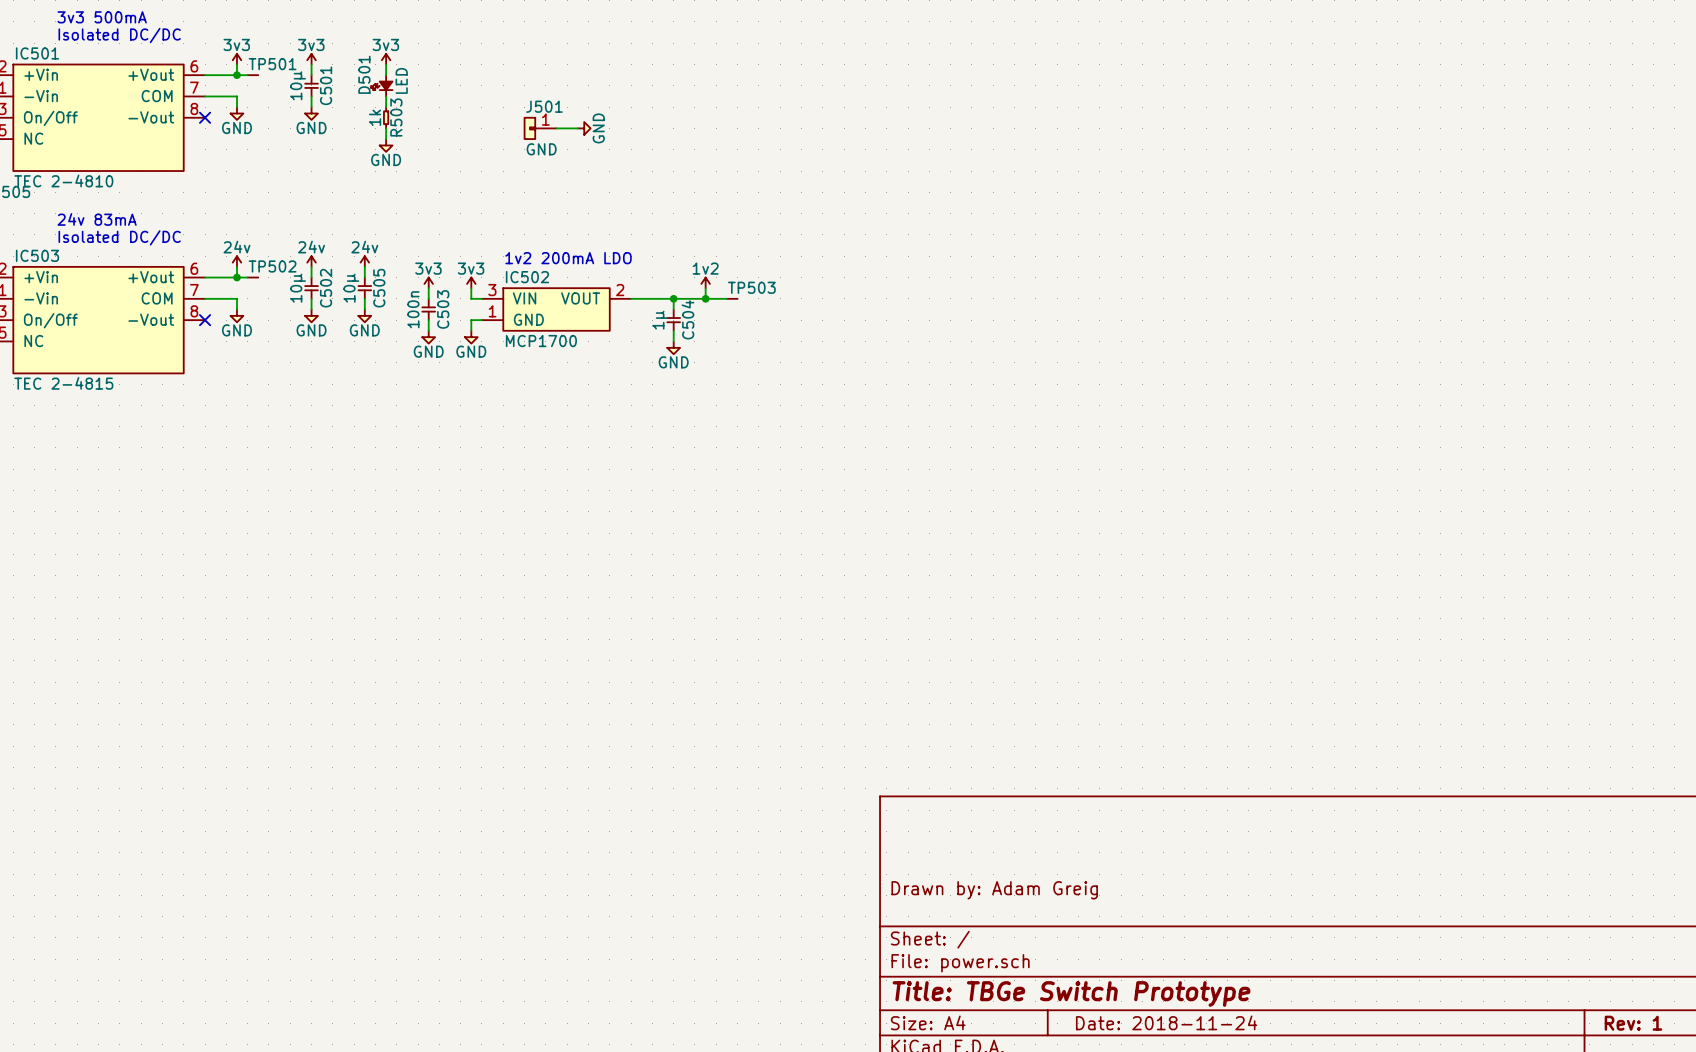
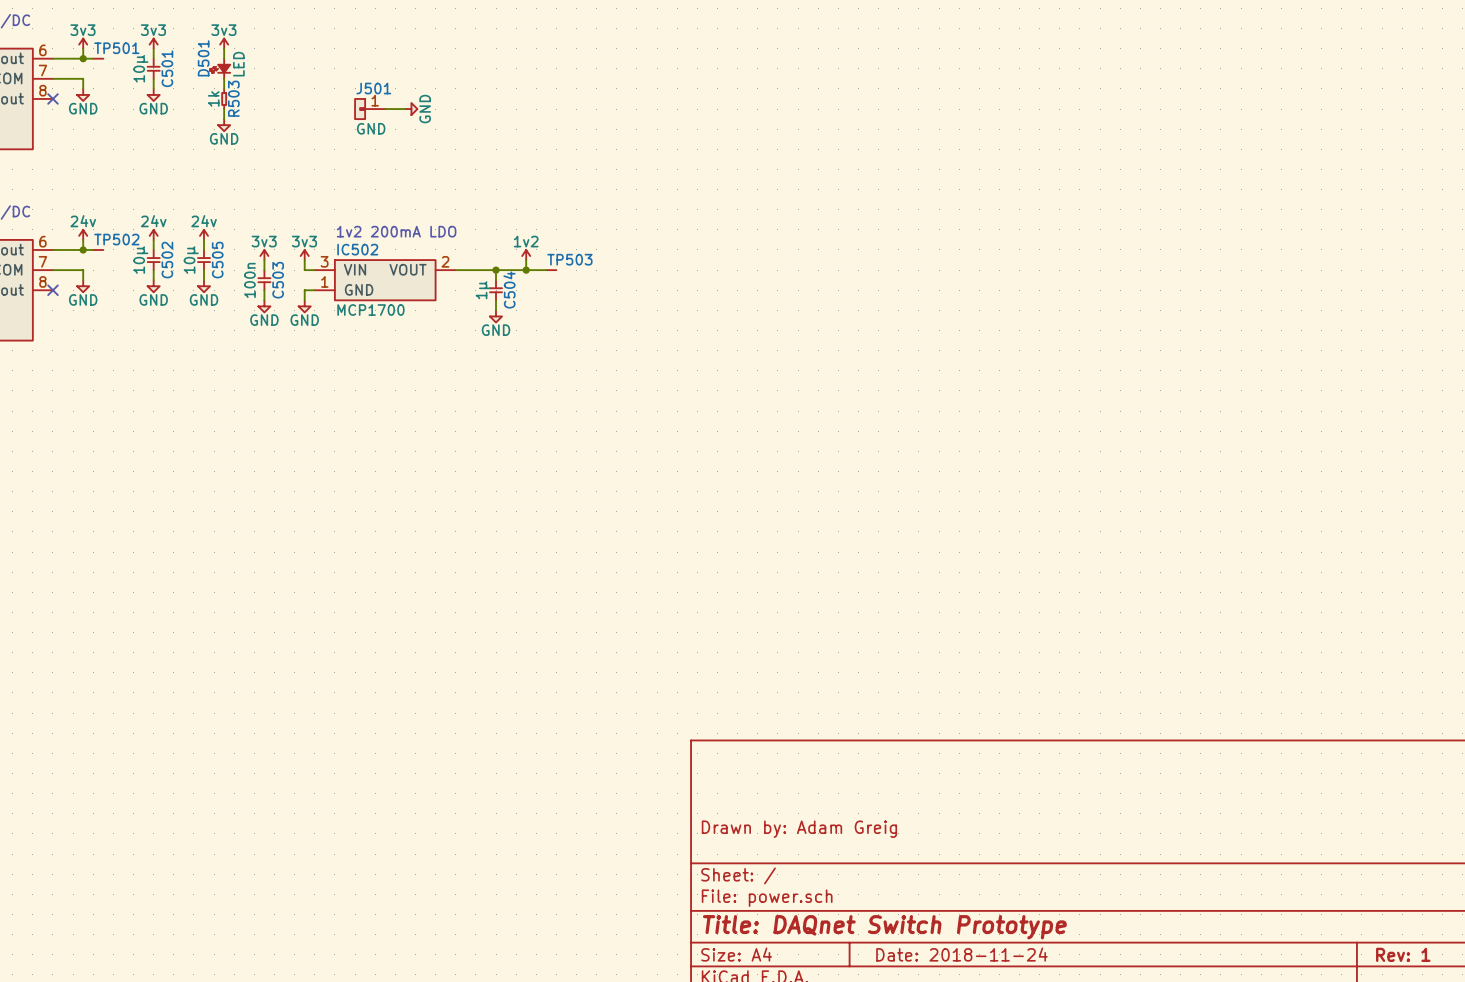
title block: Title: TBGe Switch Prototype (1071, 993) -> Title: DAQnet Switch Prototype (884, 927)

